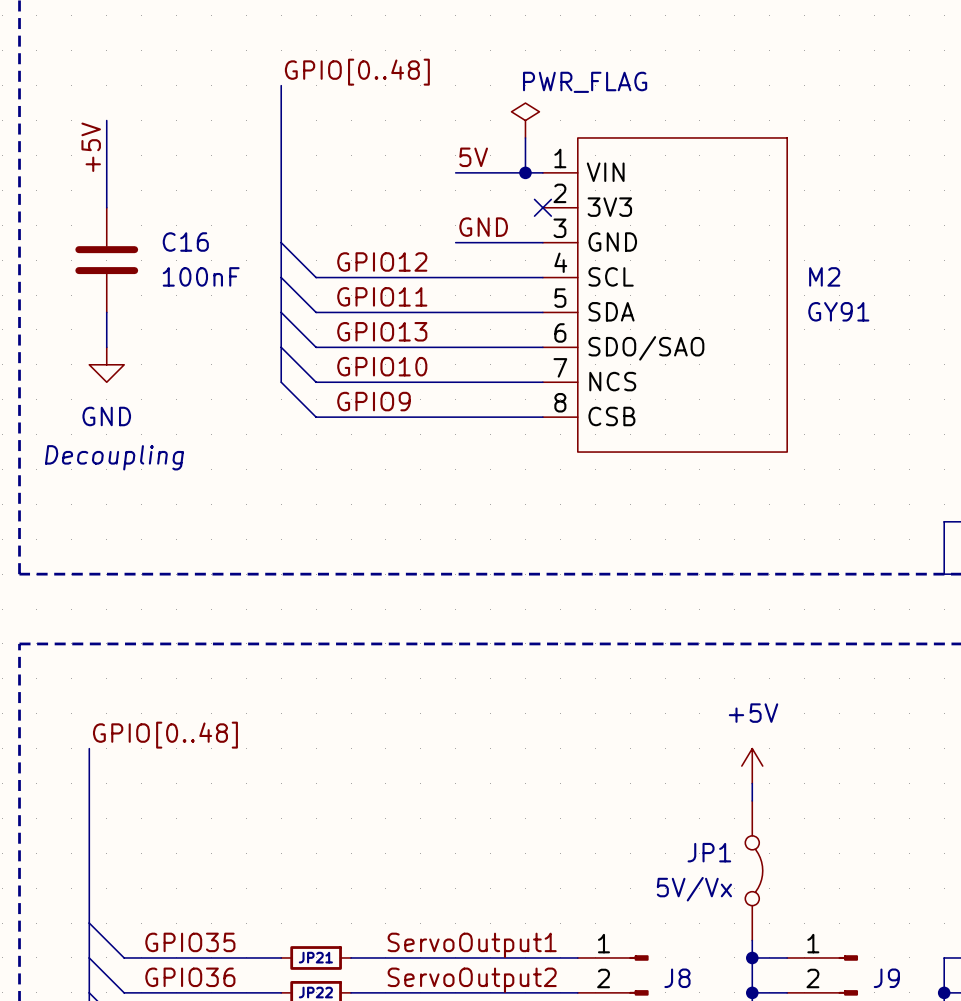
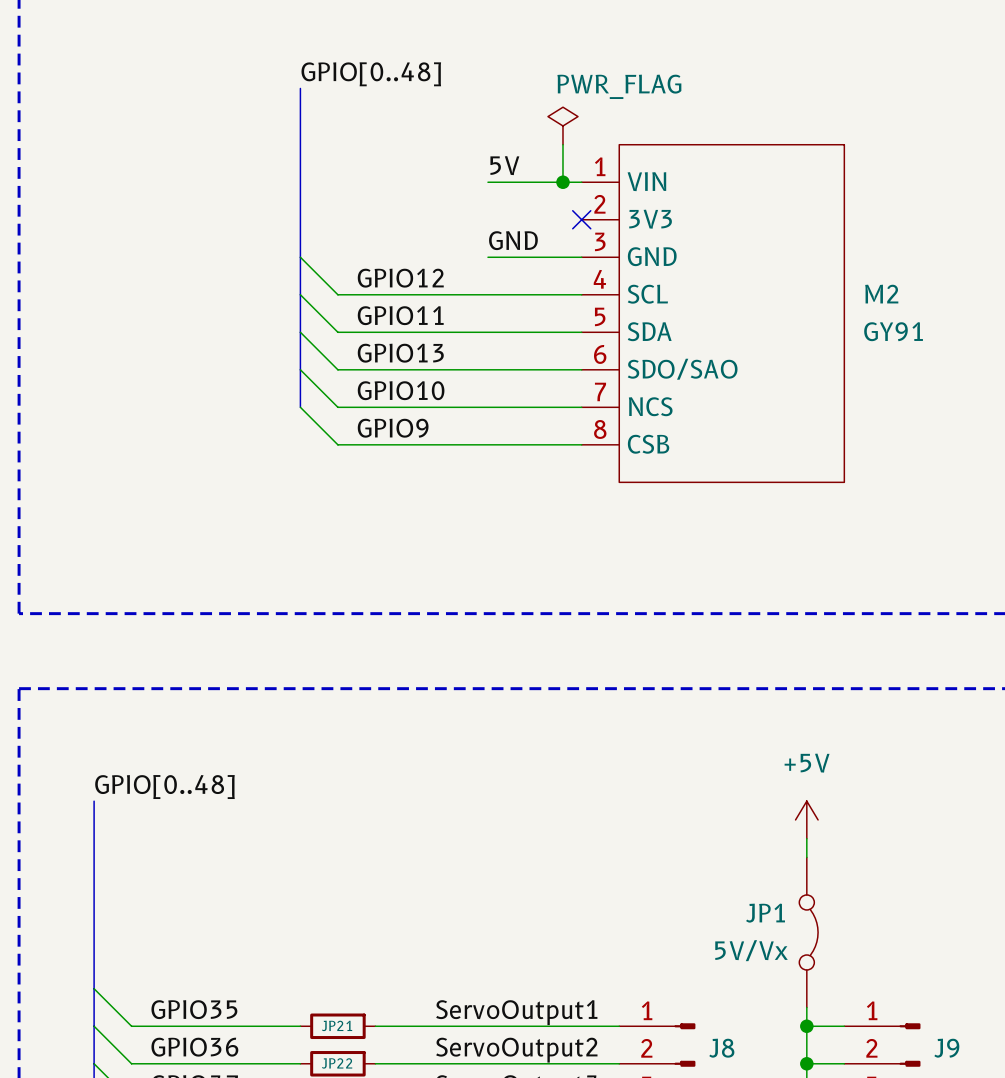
wire: (106, 120) (106, 207) -> none
label: +5V (91, 147) -> none
C16: 100nF (106, 260) -> none
wire: (106, 312) (106, 347) -> none
power symbol: GND (106, 364) -> none

